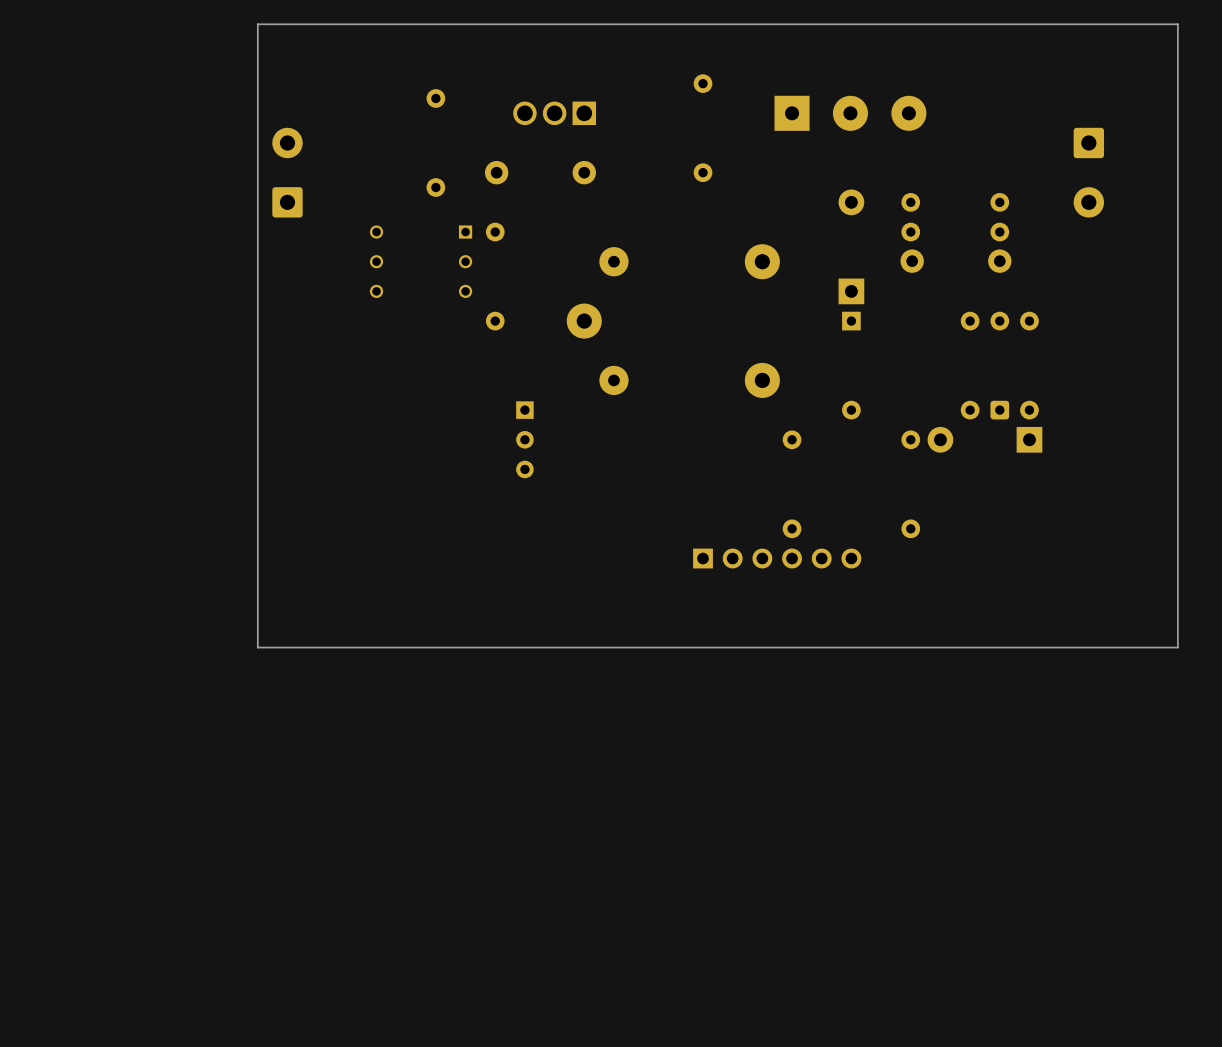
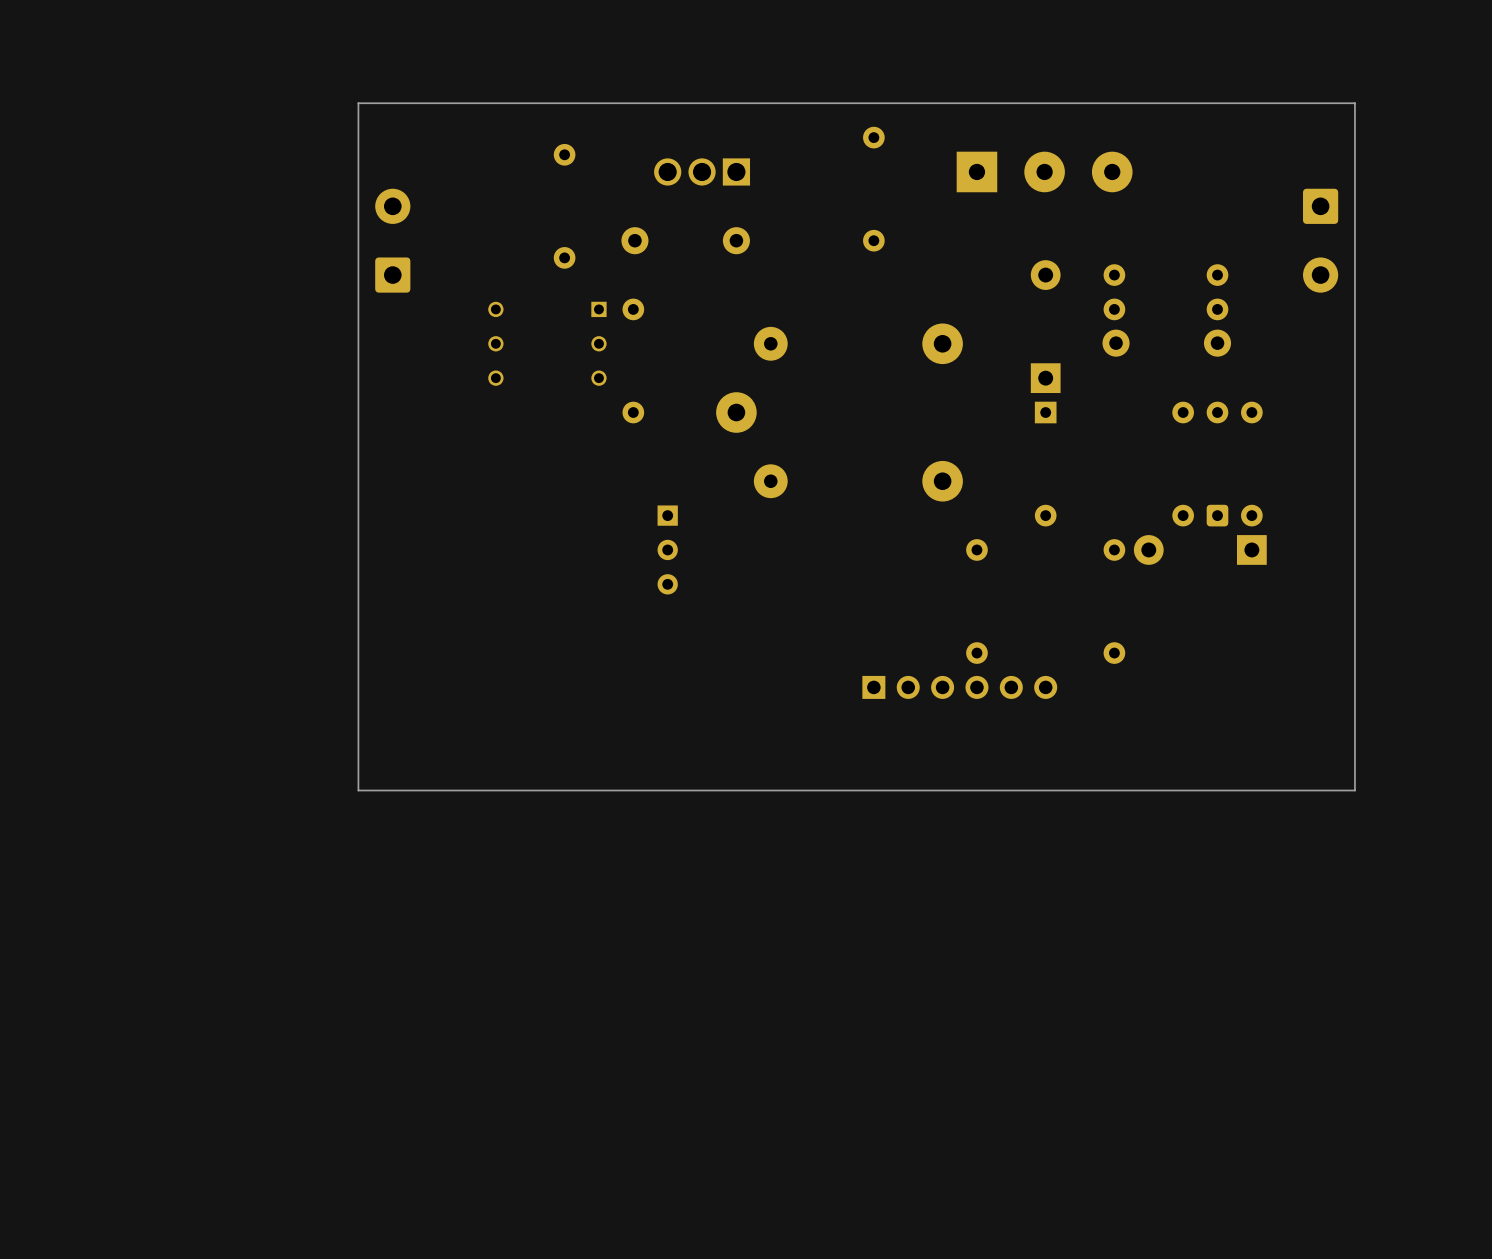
board edge: (257, 53) (257, 24) (1177, 24) (1177, 647) (1118, 647) -> (358, 103) (1354, 103) (1354, 790)

